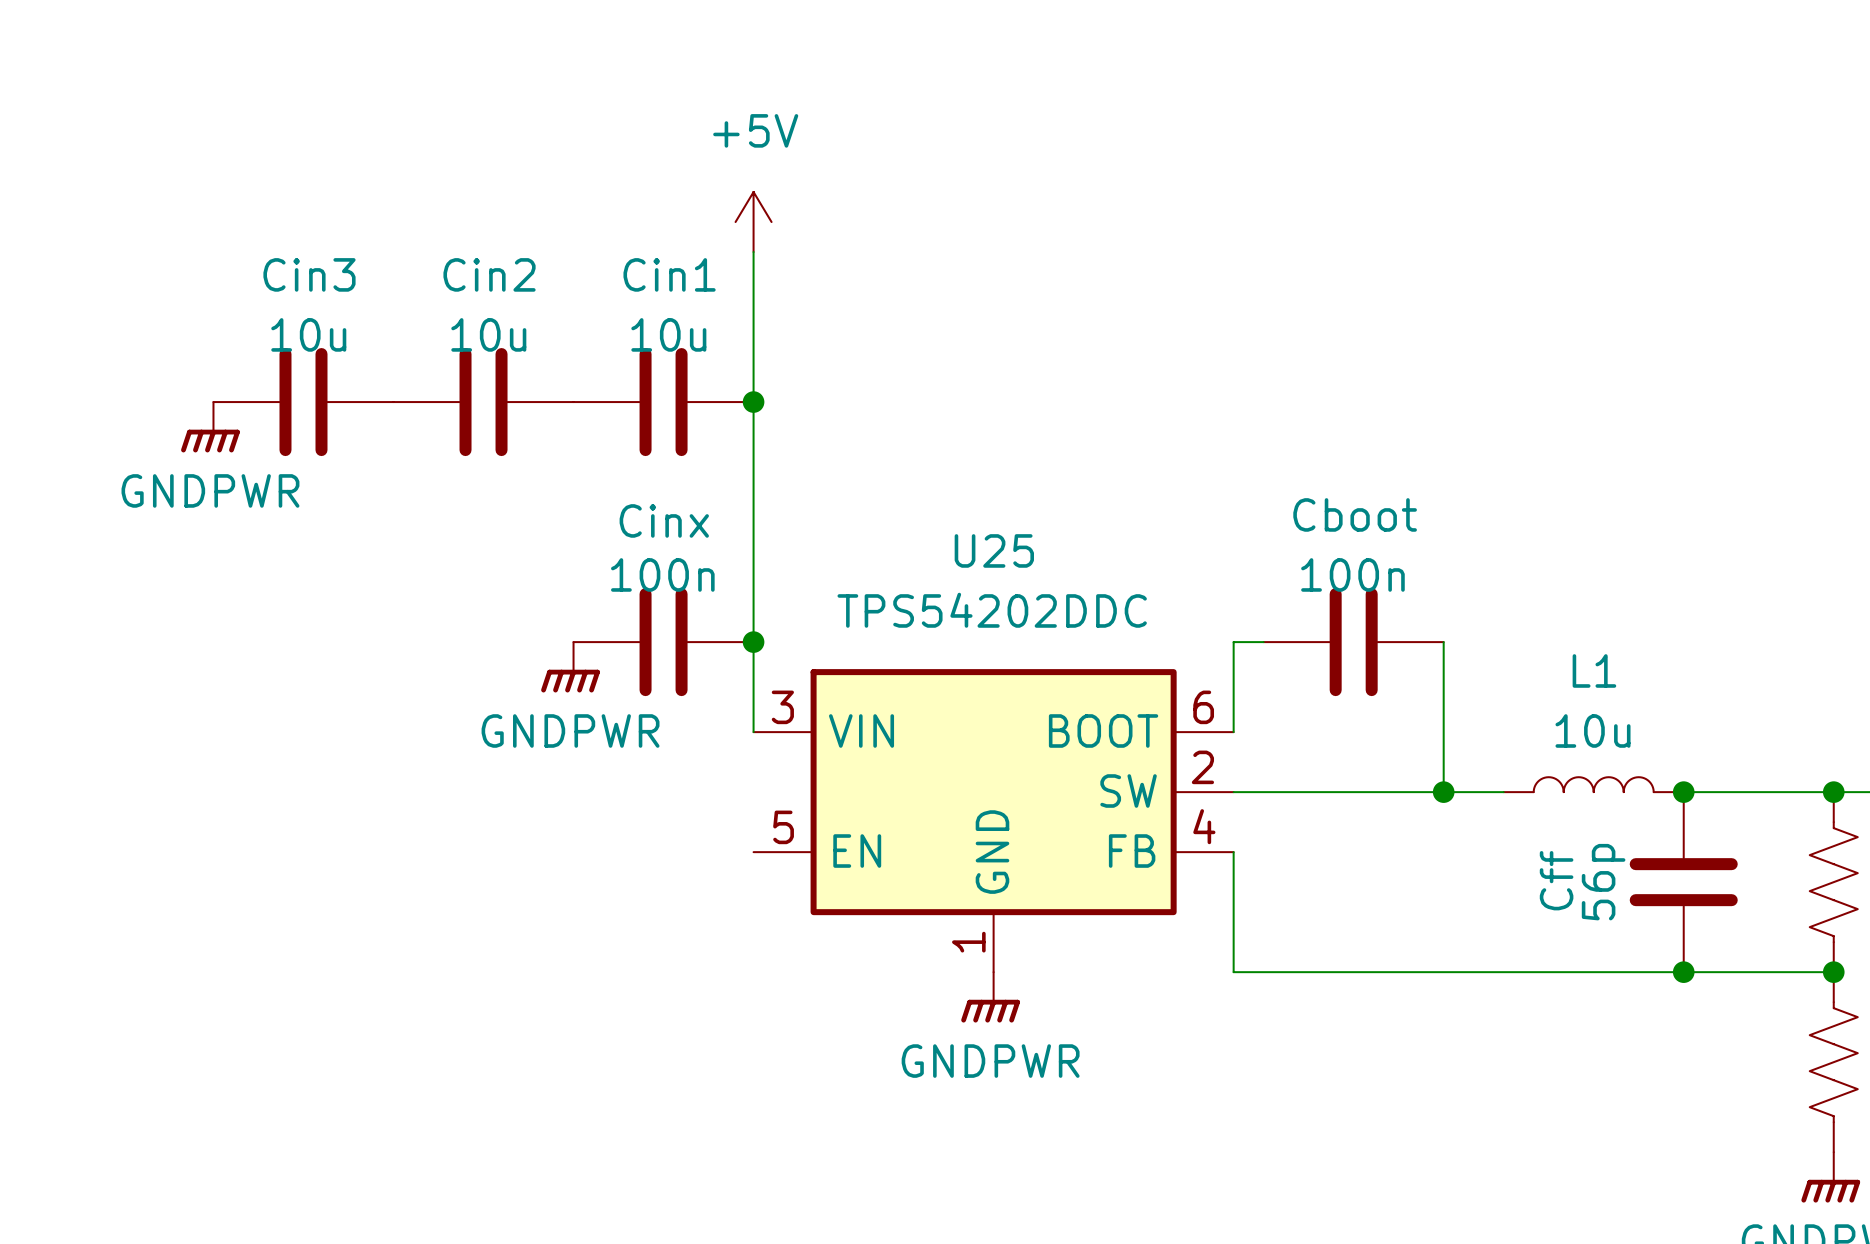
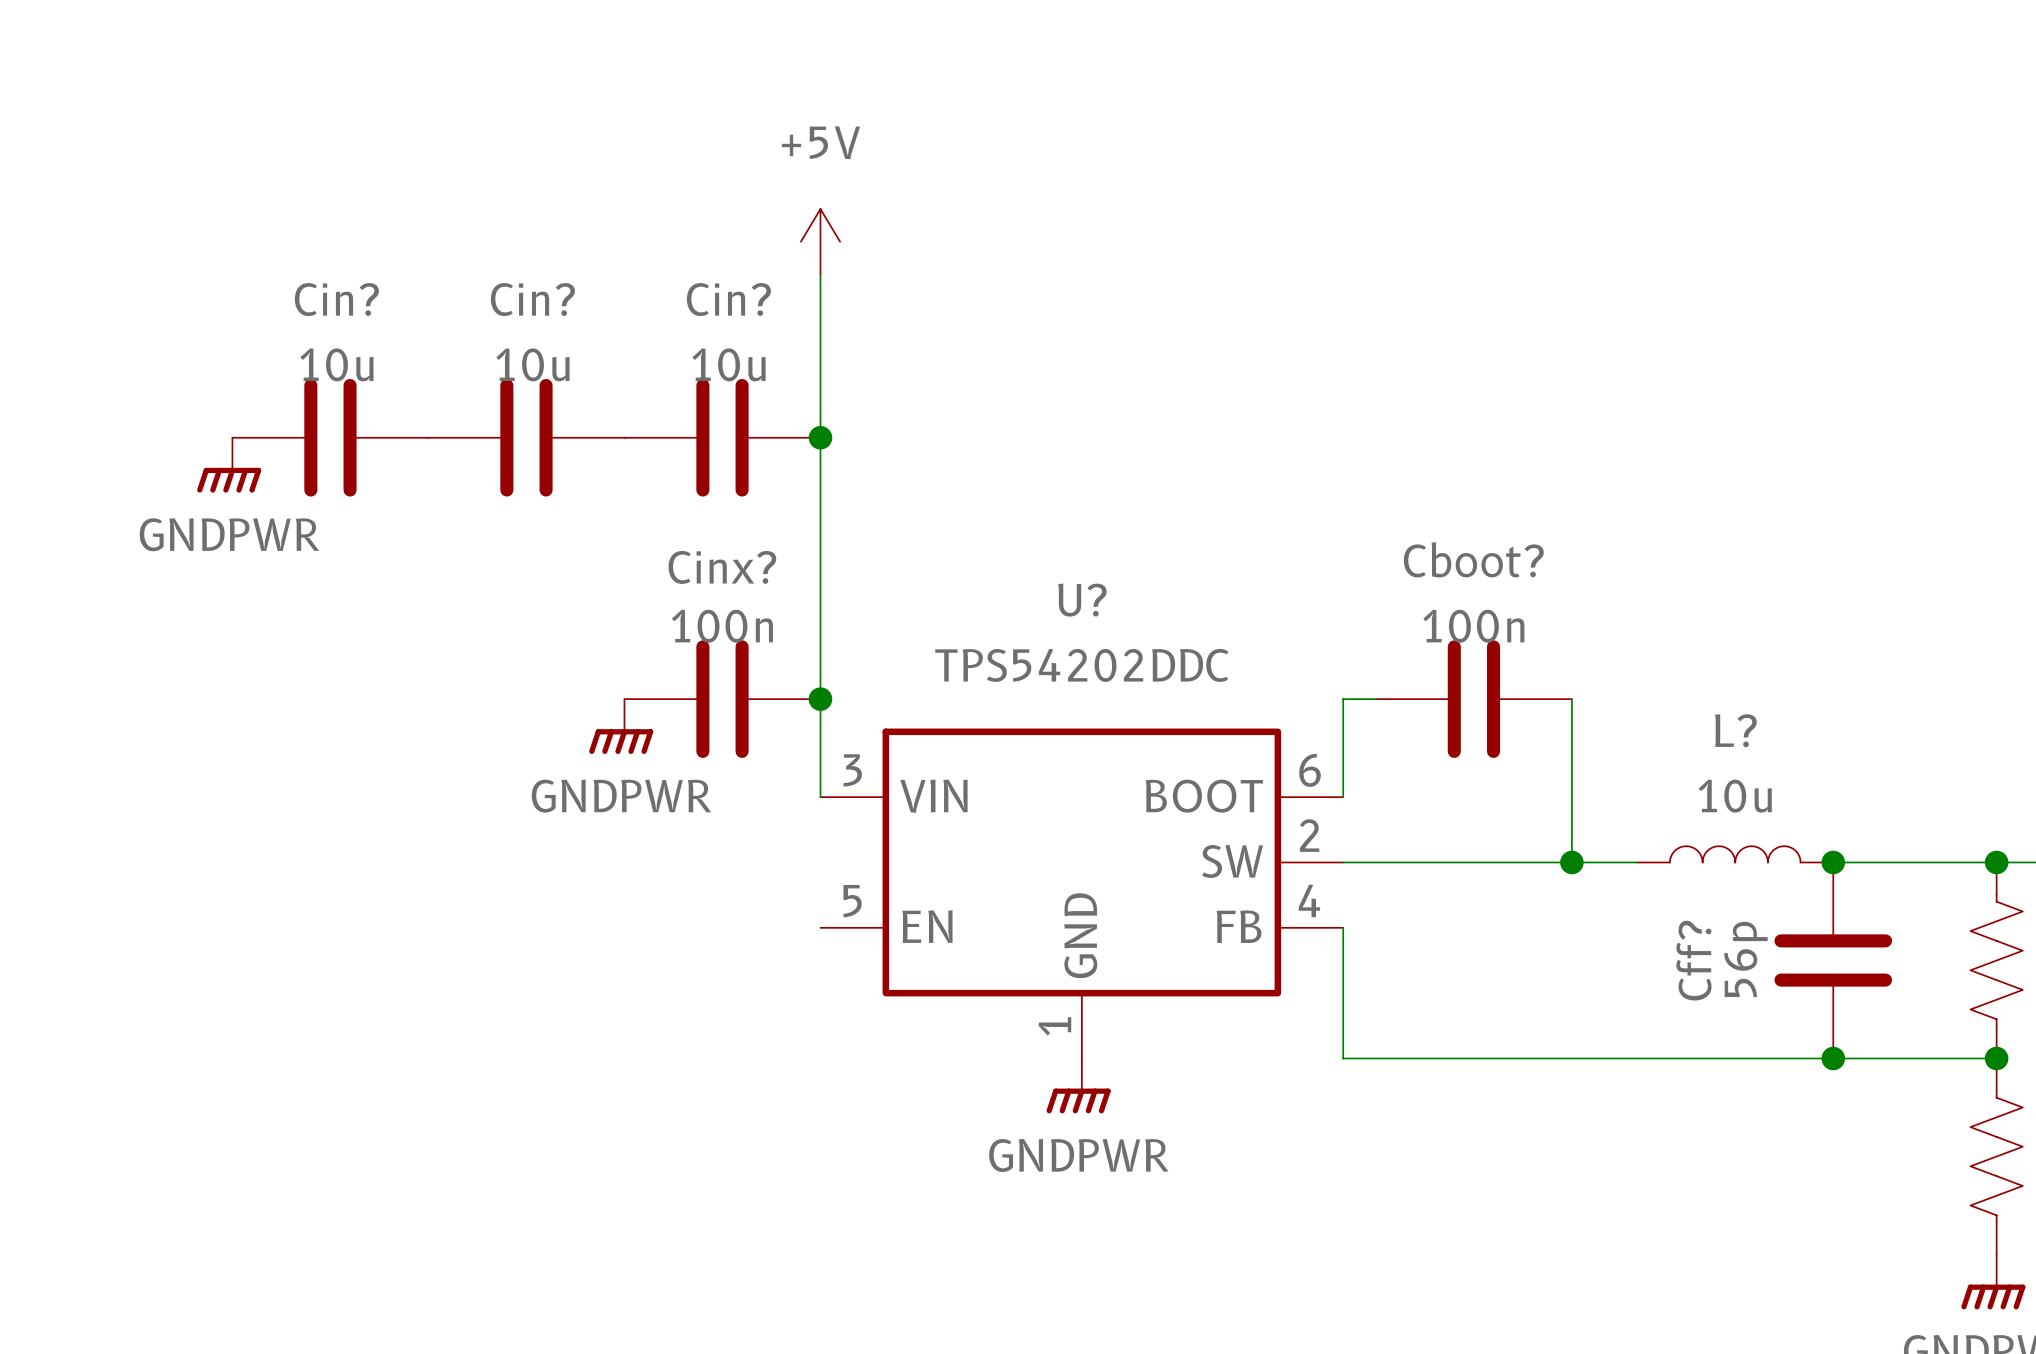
Cin3 name: Cin3 (309, 274) -> Cin? (336, 299)
Cin2 name: Cin2 (489, 274) -> Cin? (532, 299)
Cin1 name: Cin1 (669, 274) -> Cin? (728, 299)
Cboot name: Cboot (1355, 514) -> Cboot? (1473, 559)
Cinx name: Cinx (664, 520) -> Cinx? (722, 567)
U25 name: U25 (994, 550) -> U? (1082, 600)
L1 name: L1 (1594, 670) -> L? (1735, 730)
Cff name: Cff (1556, 880) -> Cff? (1693, 960)

